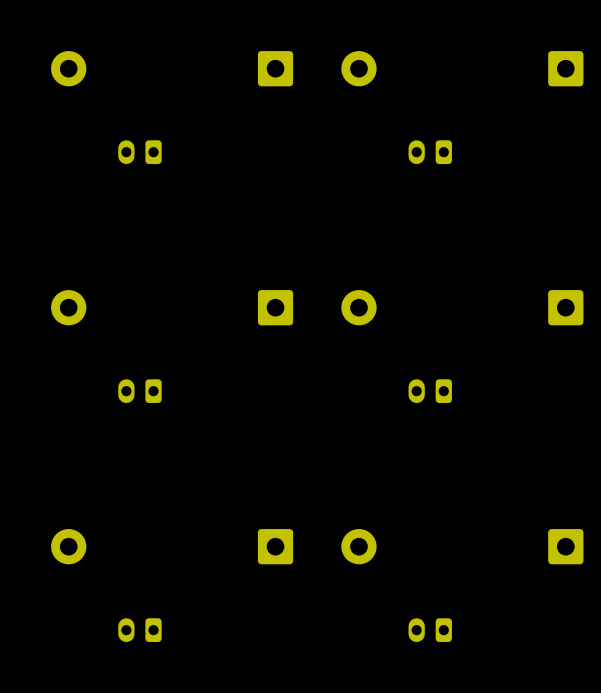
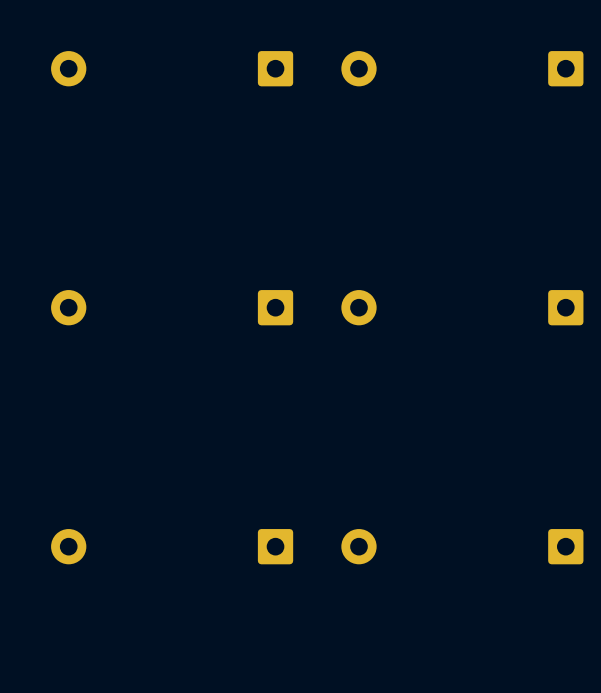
part: (139, 152) -> none
part: (430, 152) -> none
part: (139, 391) -> none
part: (430, 391) -> none
part: (139, 630) -> none
part: (430, 630) -> none

